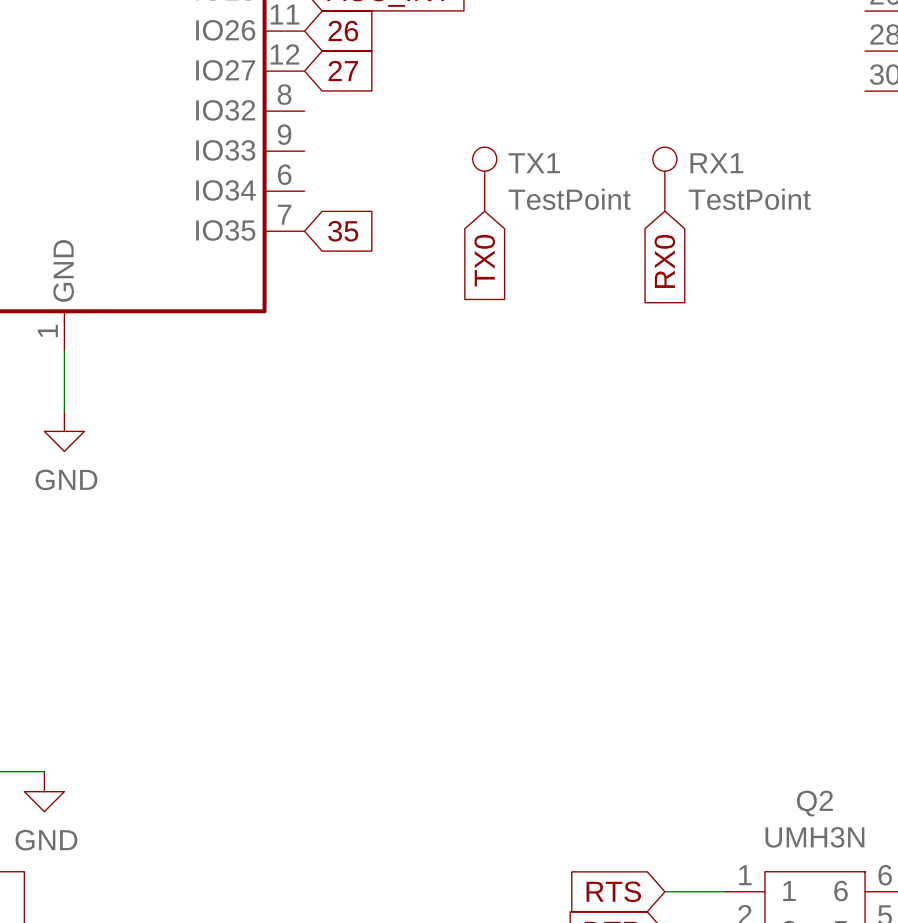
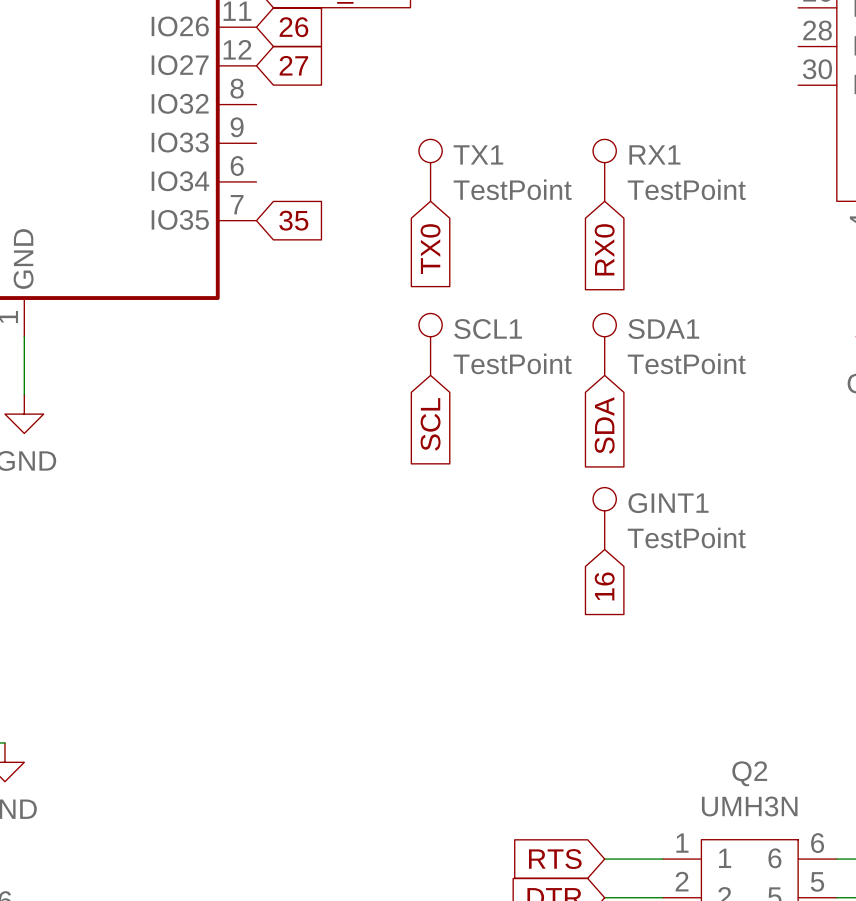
SCL1: none -> TestPoint (430, 344)
SDA1: none -> TestPoint (604, 344)
global label: none -> SCL (430, 424)
global label: none -> SDA (604, 425)
GINT1: none -> TestPoint (604, 518)
global label: none -> 16 (604, 586)

